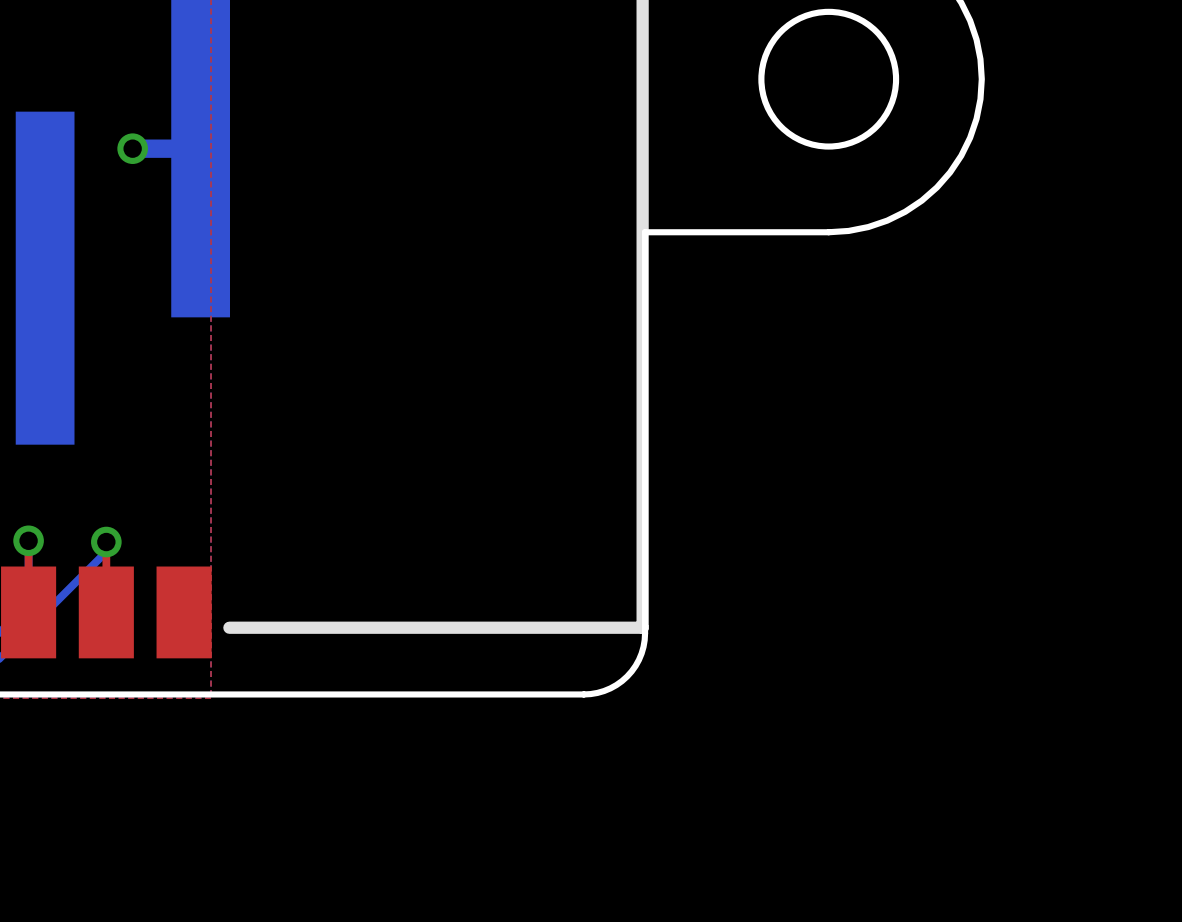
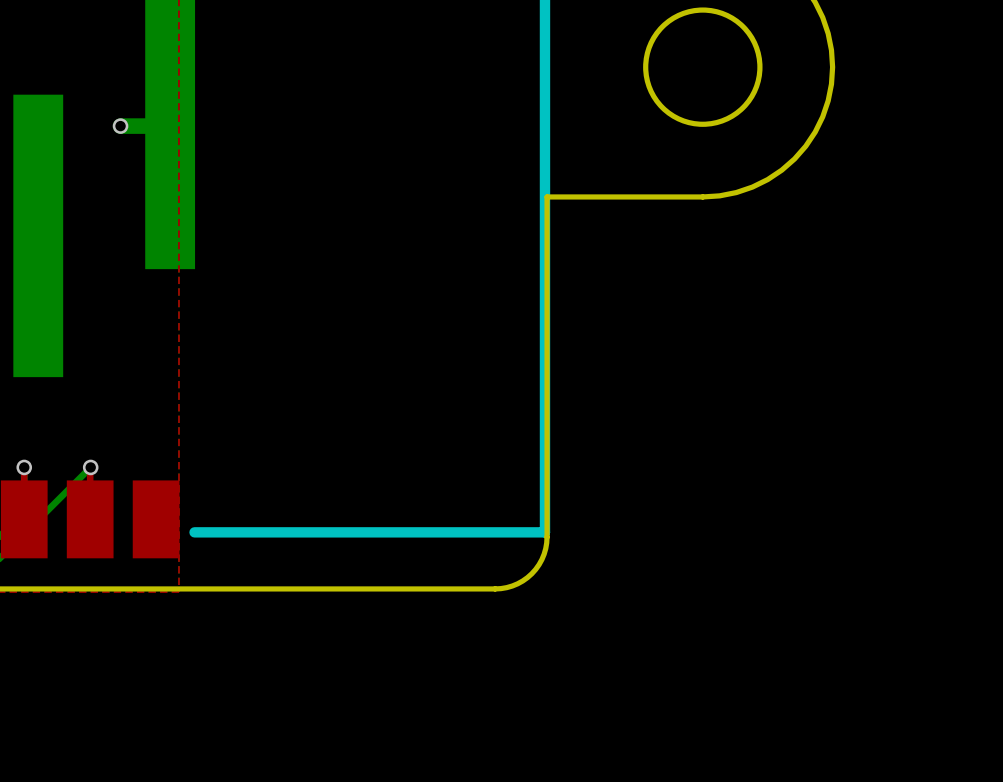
via size: [117, 133, 148, 164] -> [112, 118, 129, 134]
via size: [13, 525, 44, 557] -> [16, 459, 33, 476]
via size: [91, 526, 122, 558] -> [82, 459, 99, 476]

